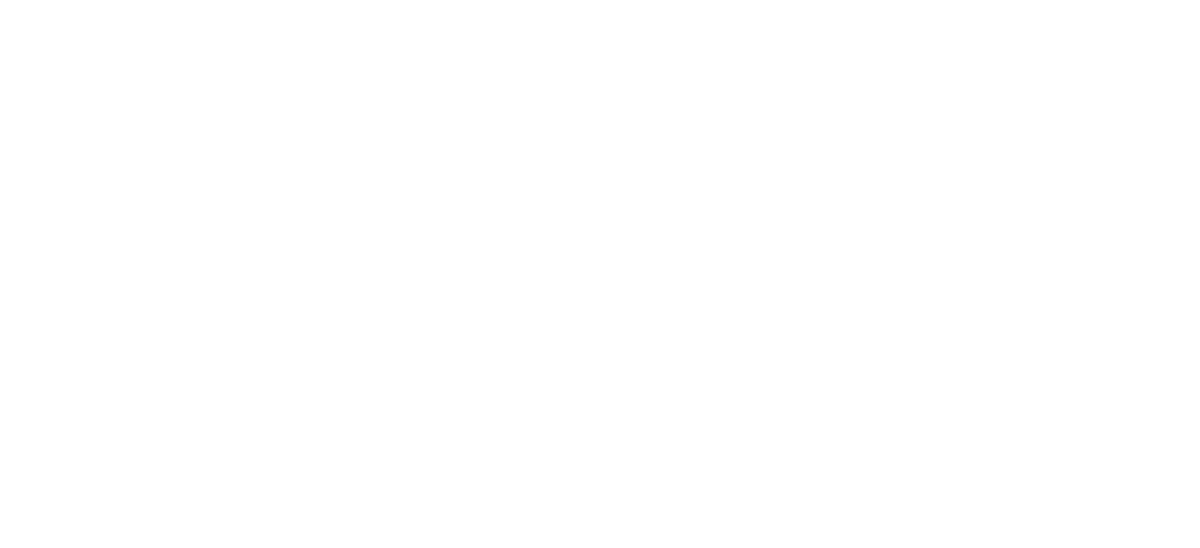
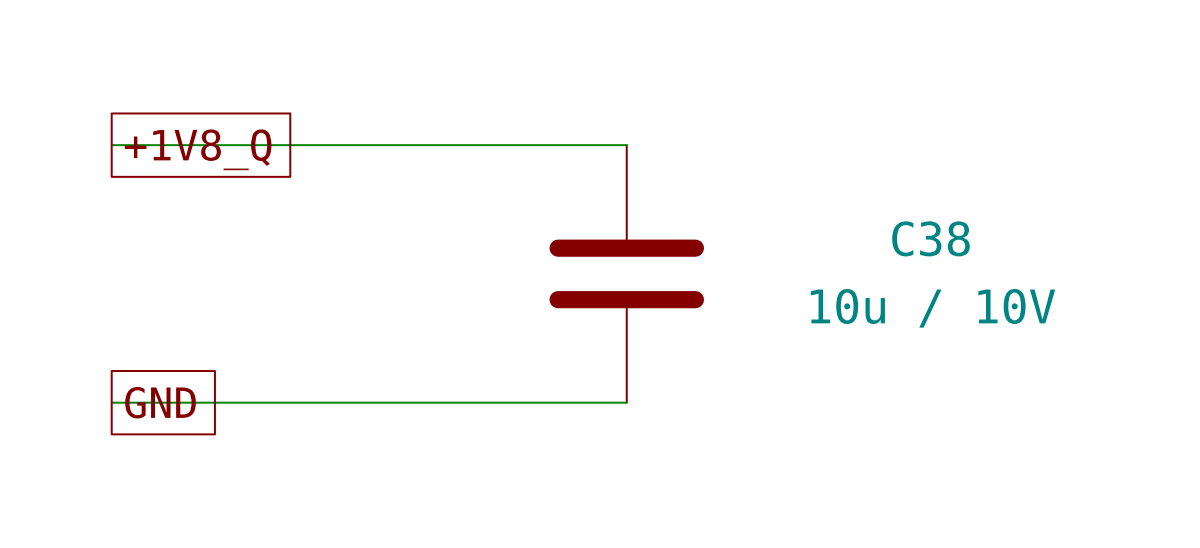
wire: none -> (111, 145) (626, 145)
global label: none -> +1V8_Q (198, 149)
C38: none -> 10u / 10V (626, 273)
wire: none -> (111, 402) (626, 402)
global label: none -> GND (160, 402)

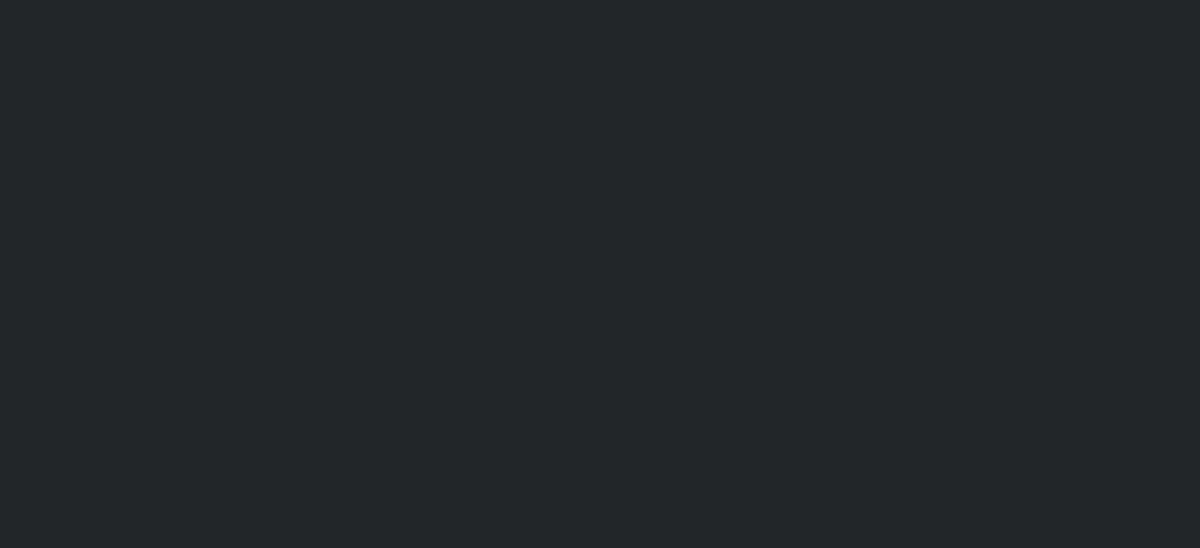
wire: (111, 145) (626, 145) -> none
global label: +1V8_Q (198, 149) -> none
C38: 10u / 10V (626, 273) -> none
wire: (111, 402) (626, 402) -> none
global label: GND (160, 402) -> none

